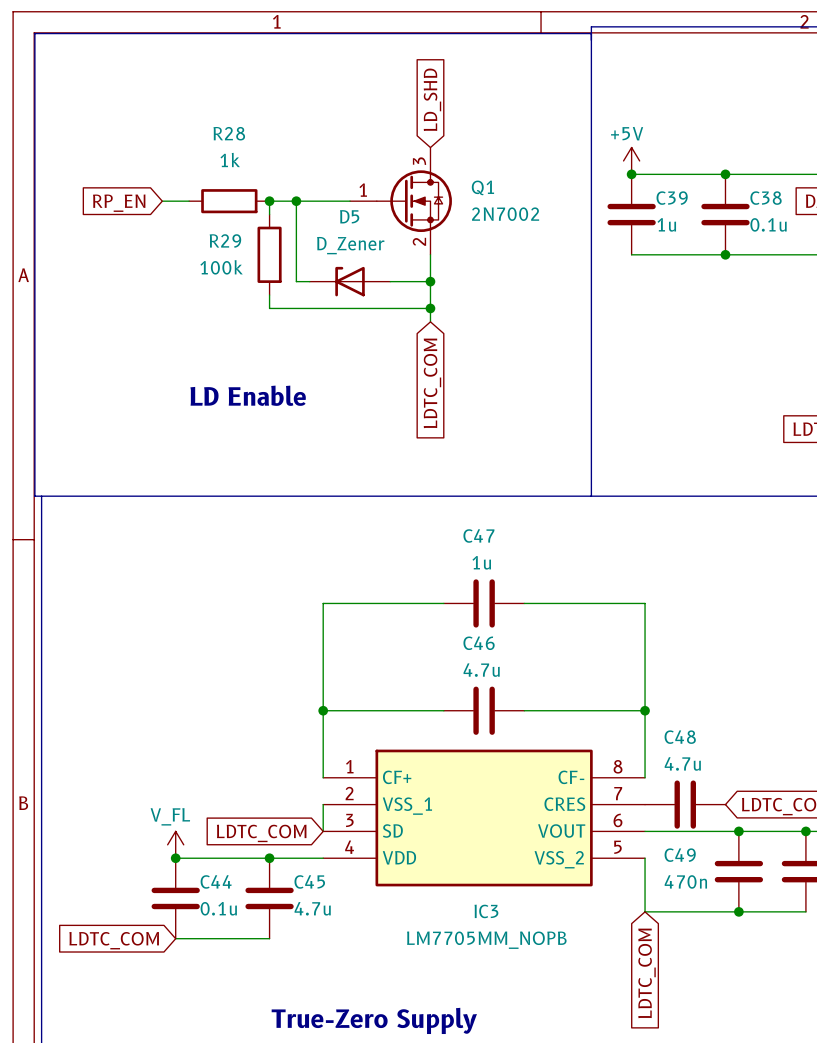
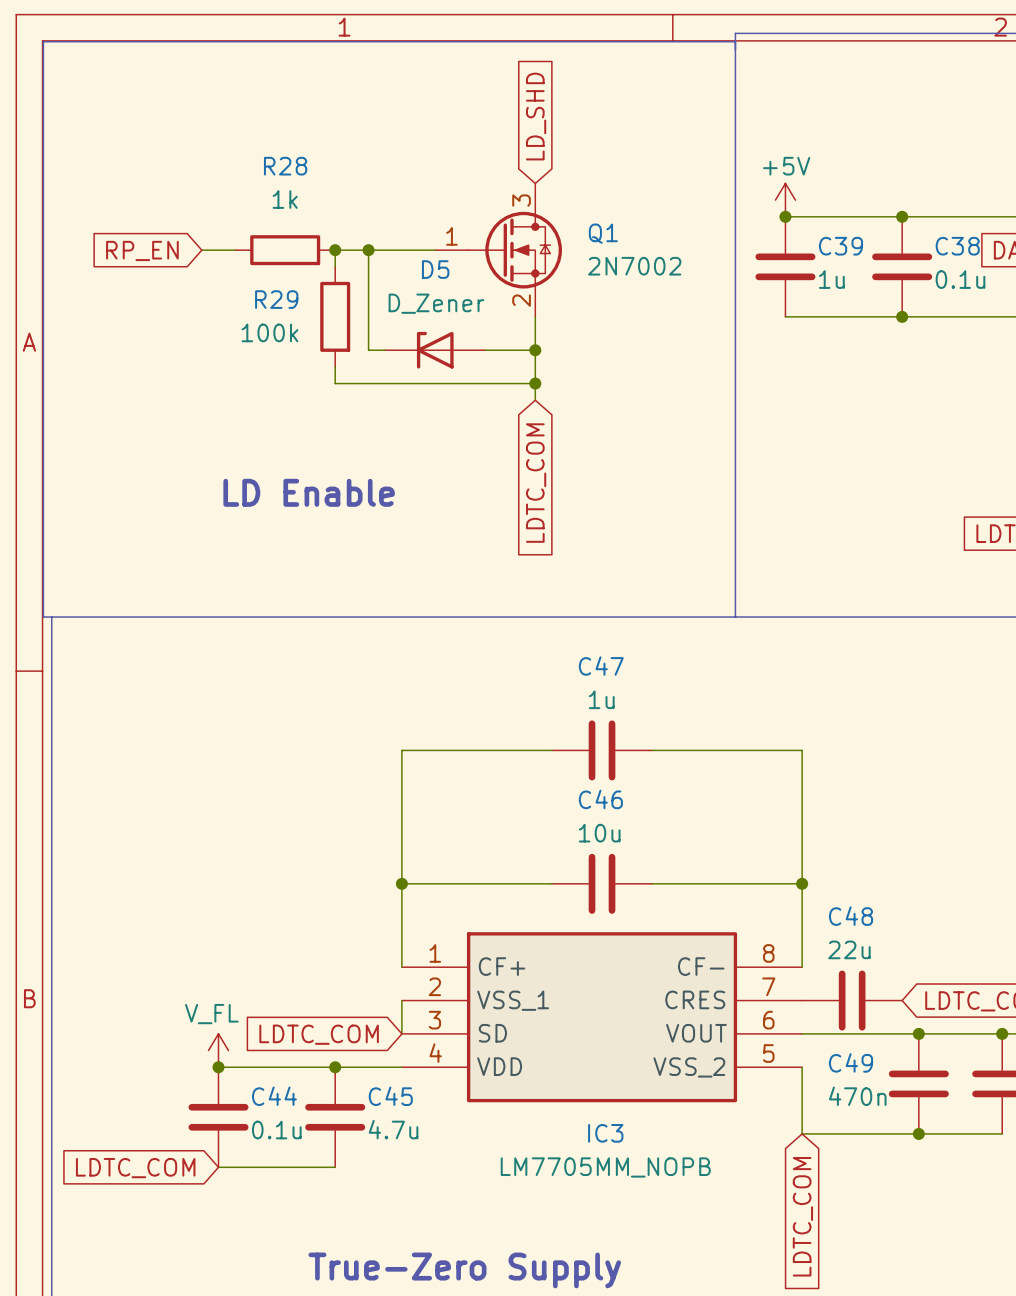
C46 value: 4.7u (481, 670) -> 10u (599, 833)
C48 value: 4.7u (682, 763) -> 22u (849, 949)

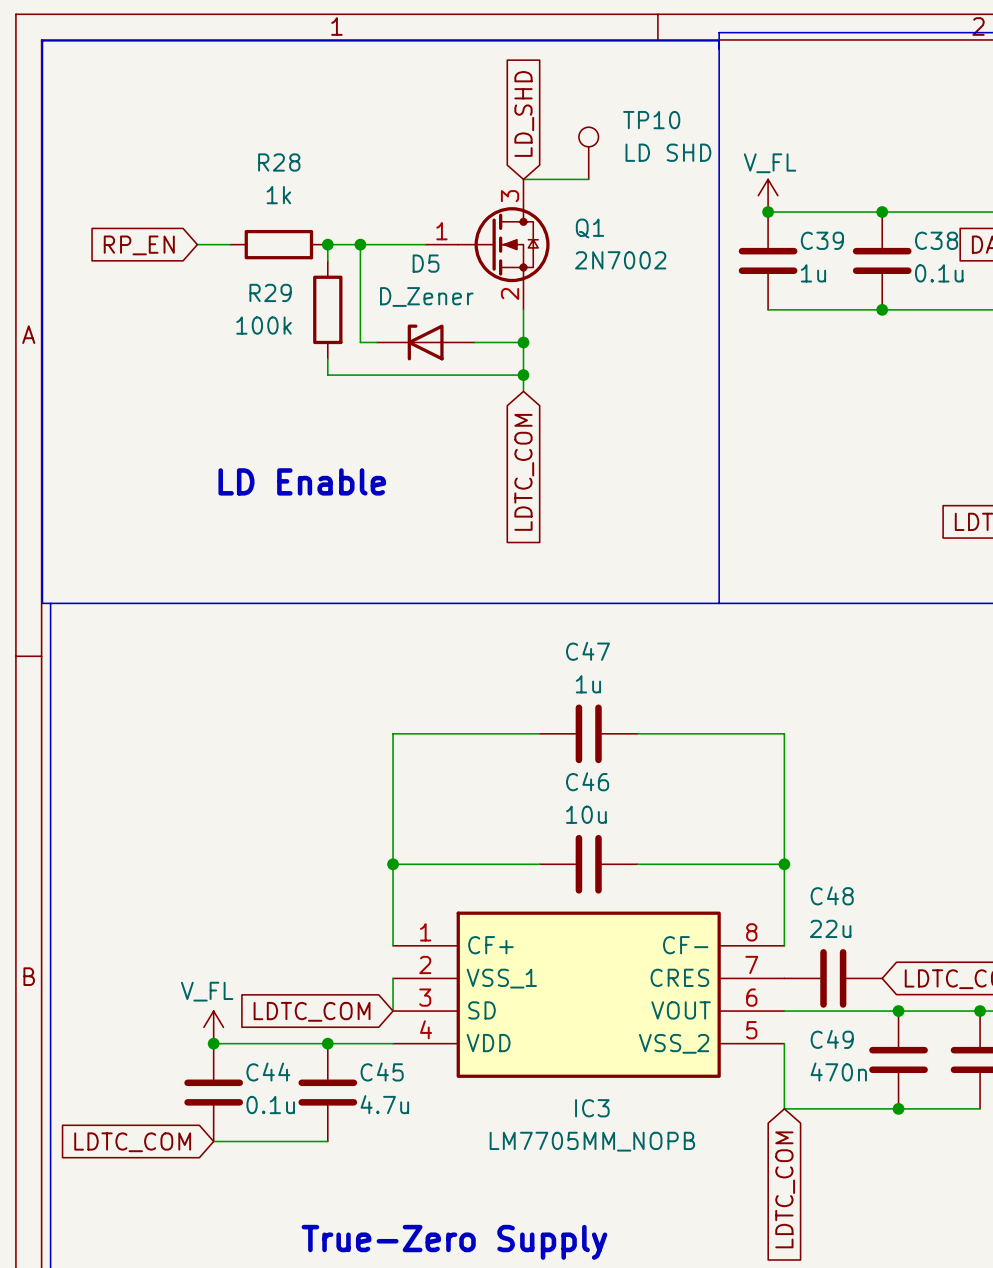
TP10: none -> LD SHD (588, 153)
wire: none -> (523, 179) (588, 179)
power symbol: +5V (785, 200) -> V_FL (768, 195)

